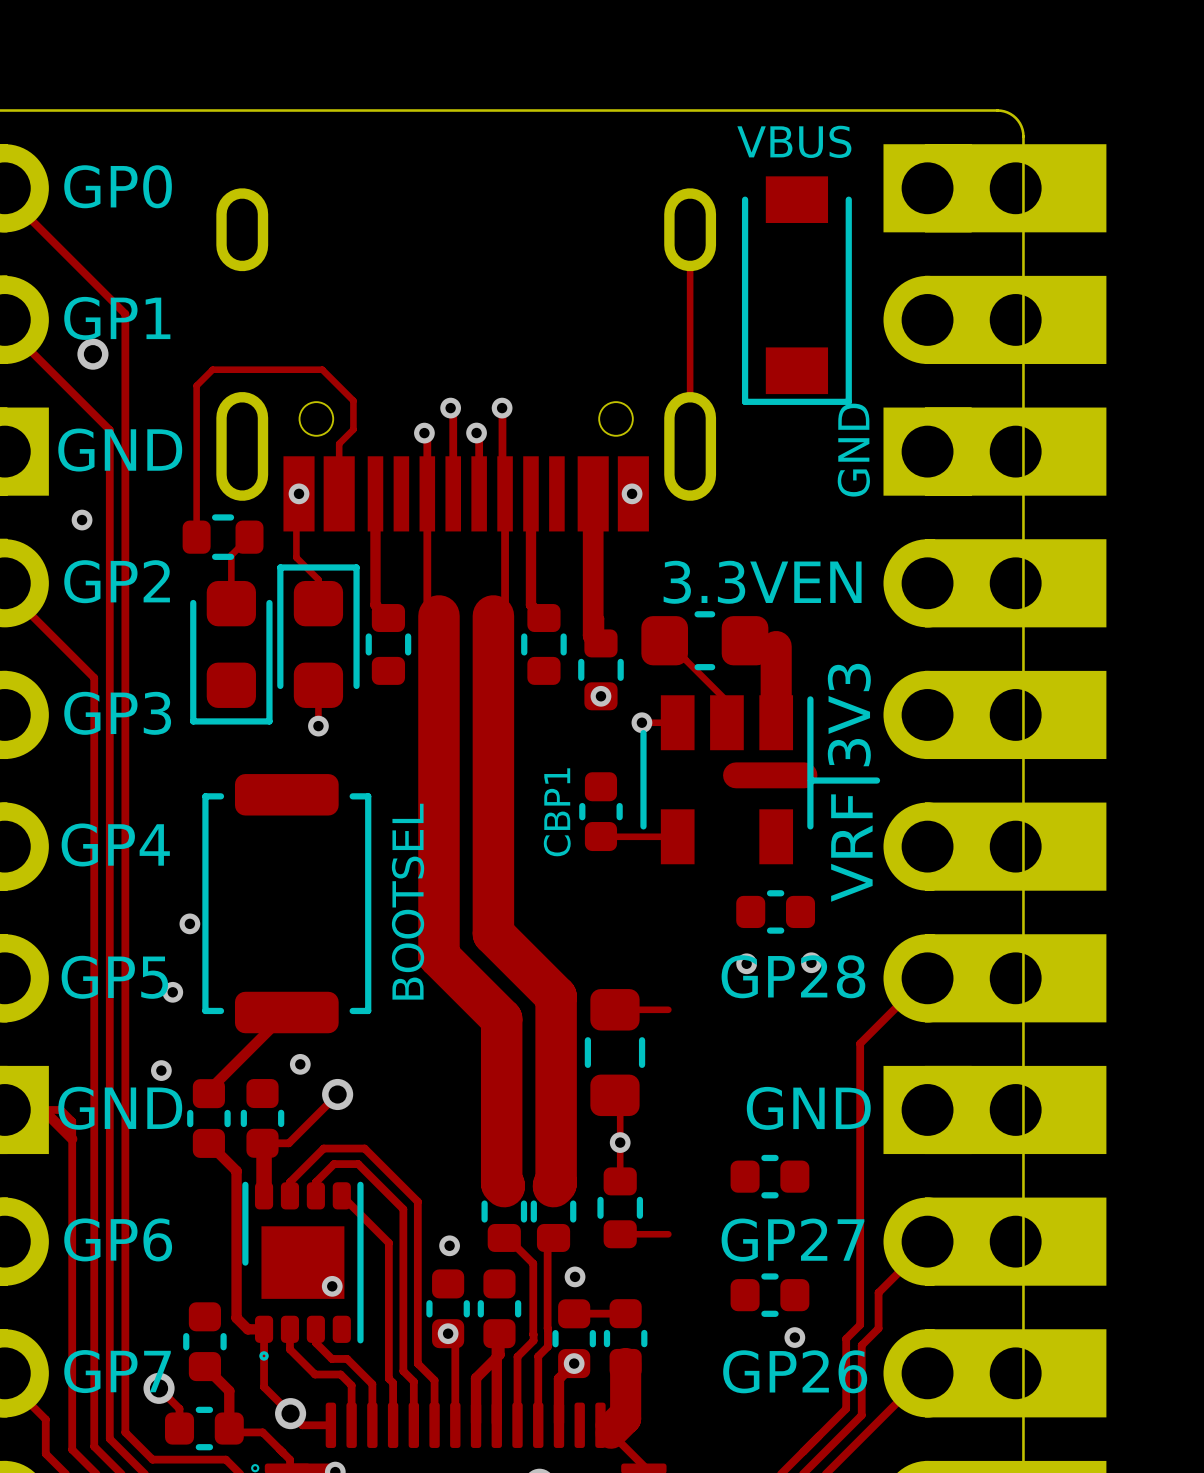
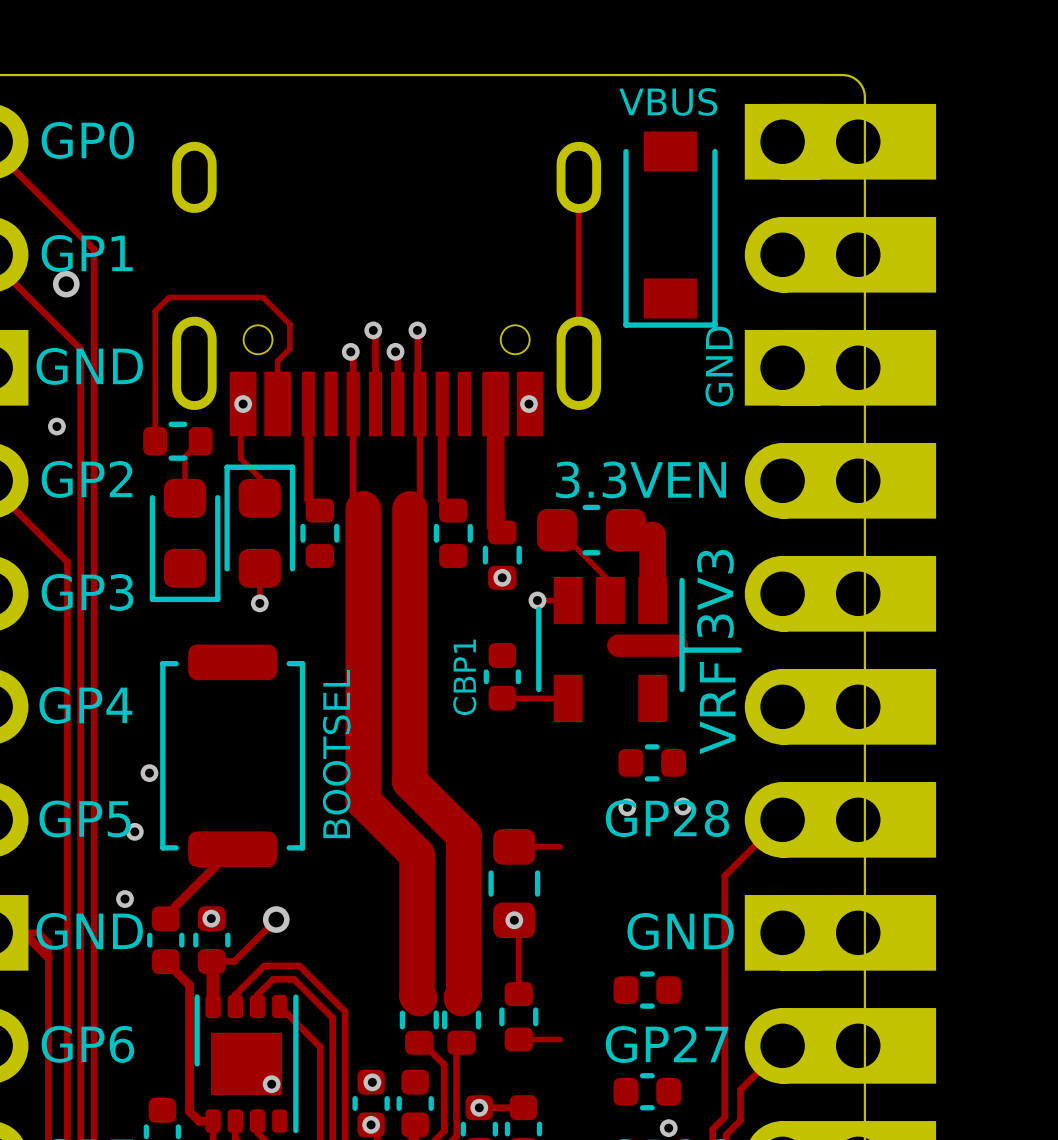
via position: (300, 1064) -> (211, 918)
via position: (620, 1142) -> (514, 920)
via position: (449, 1245) -> (372, 1082)
via position: (575, 1276) -> (479, 1107)

